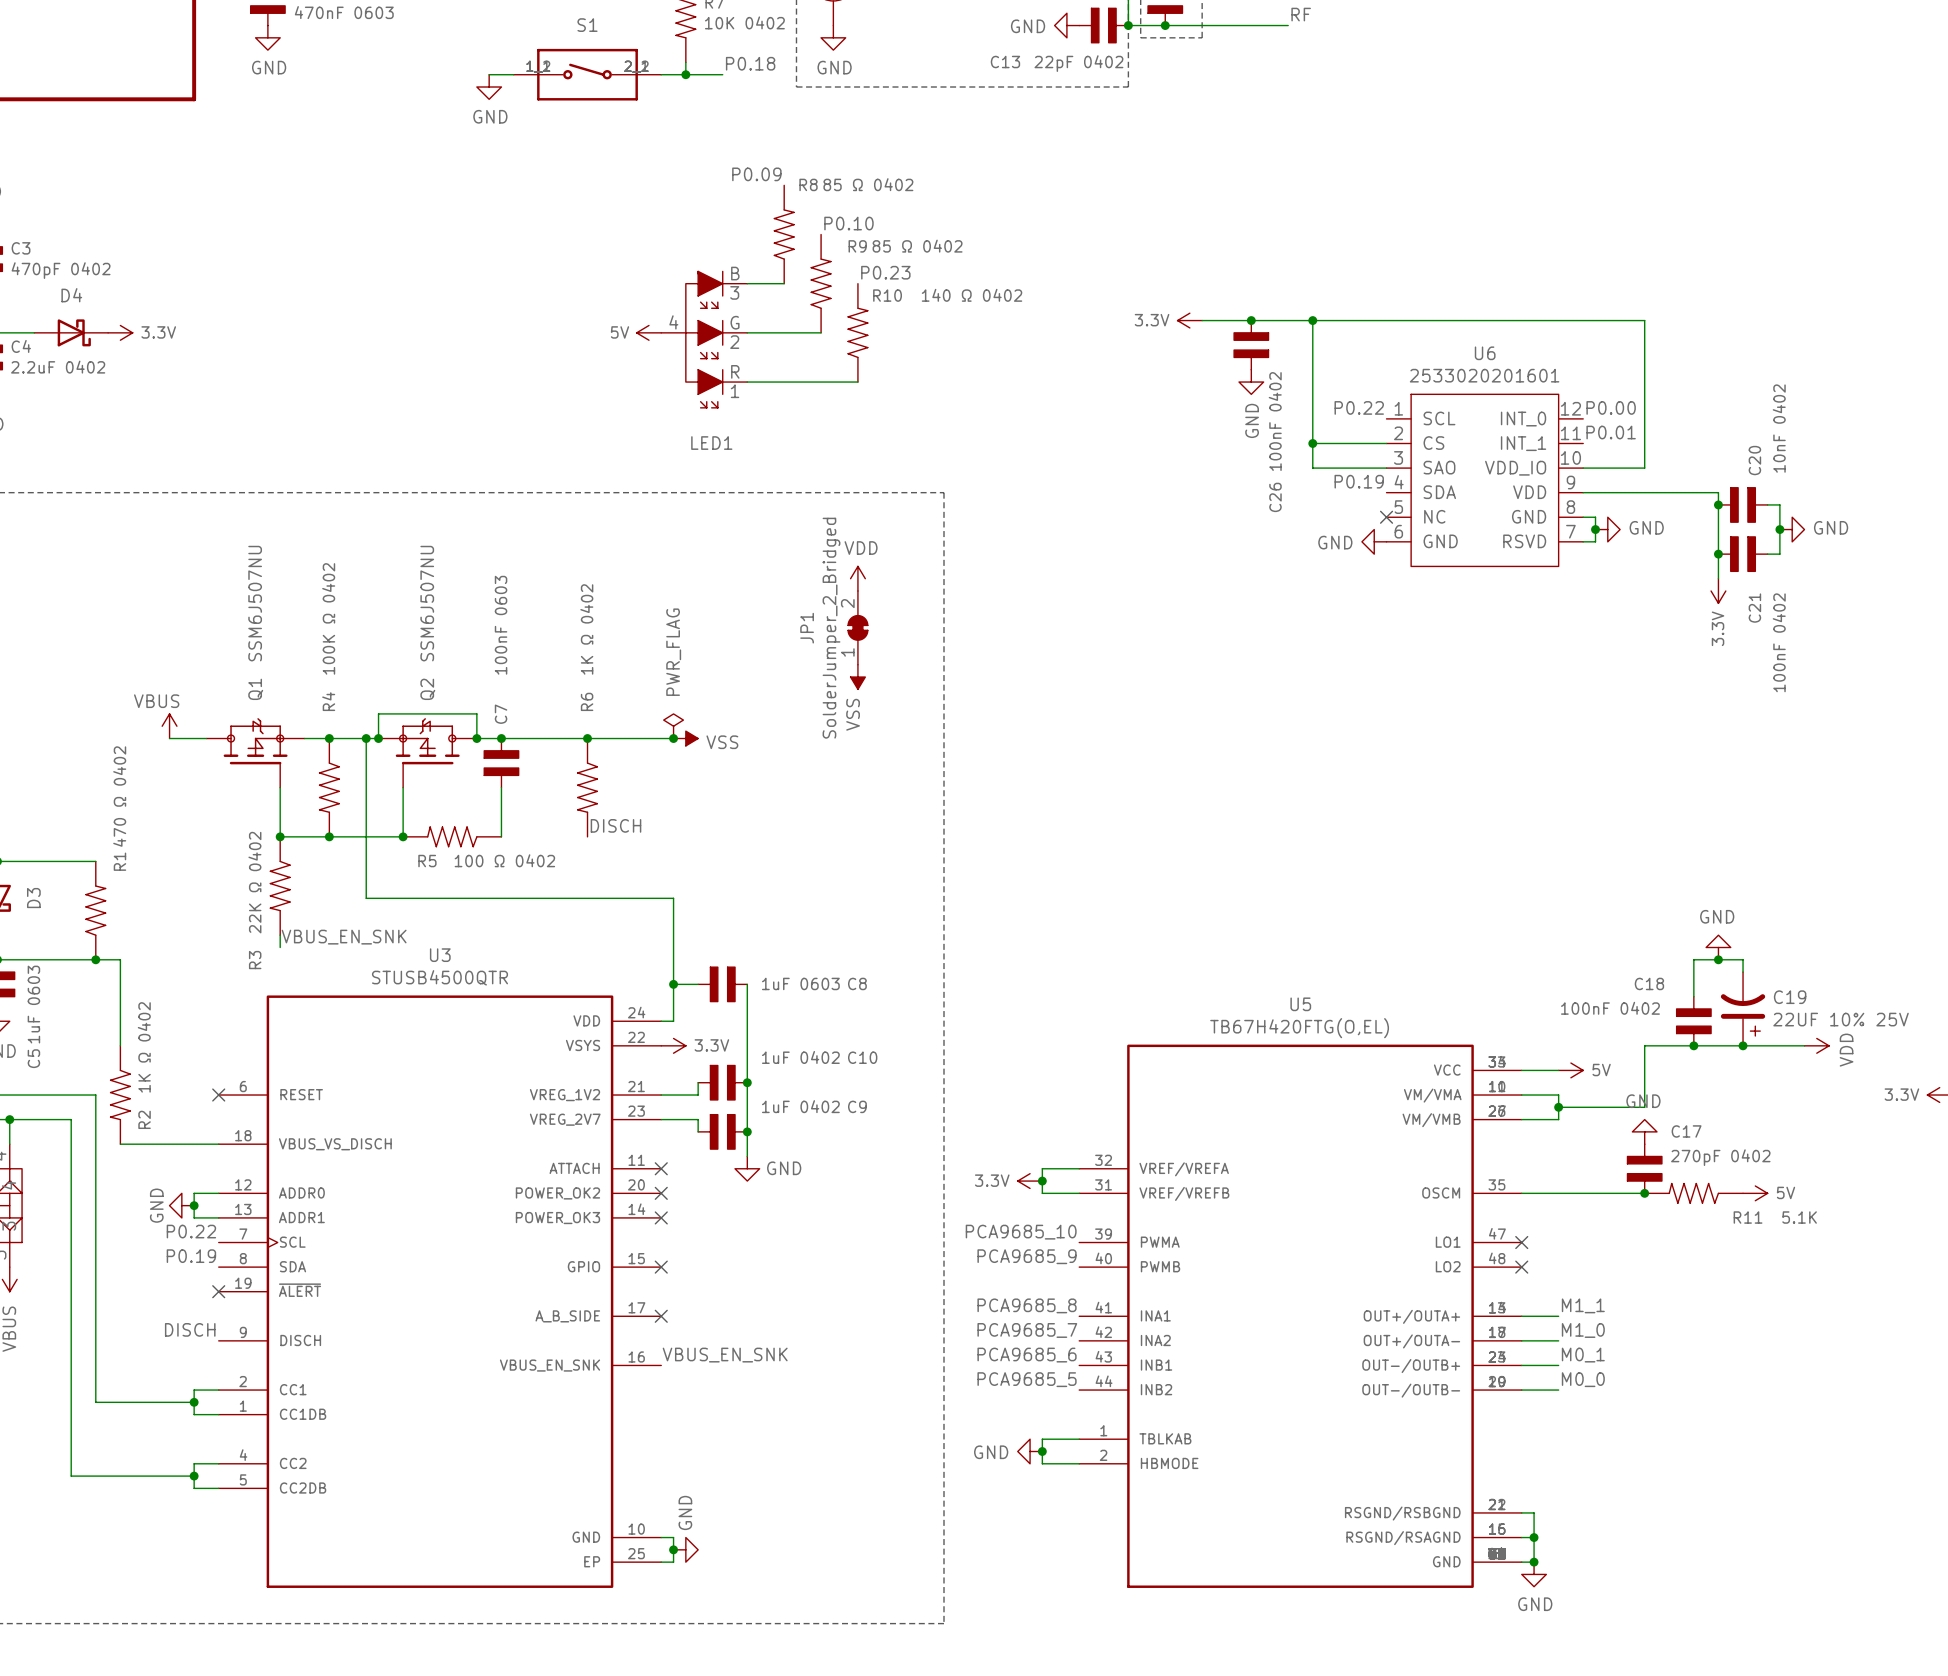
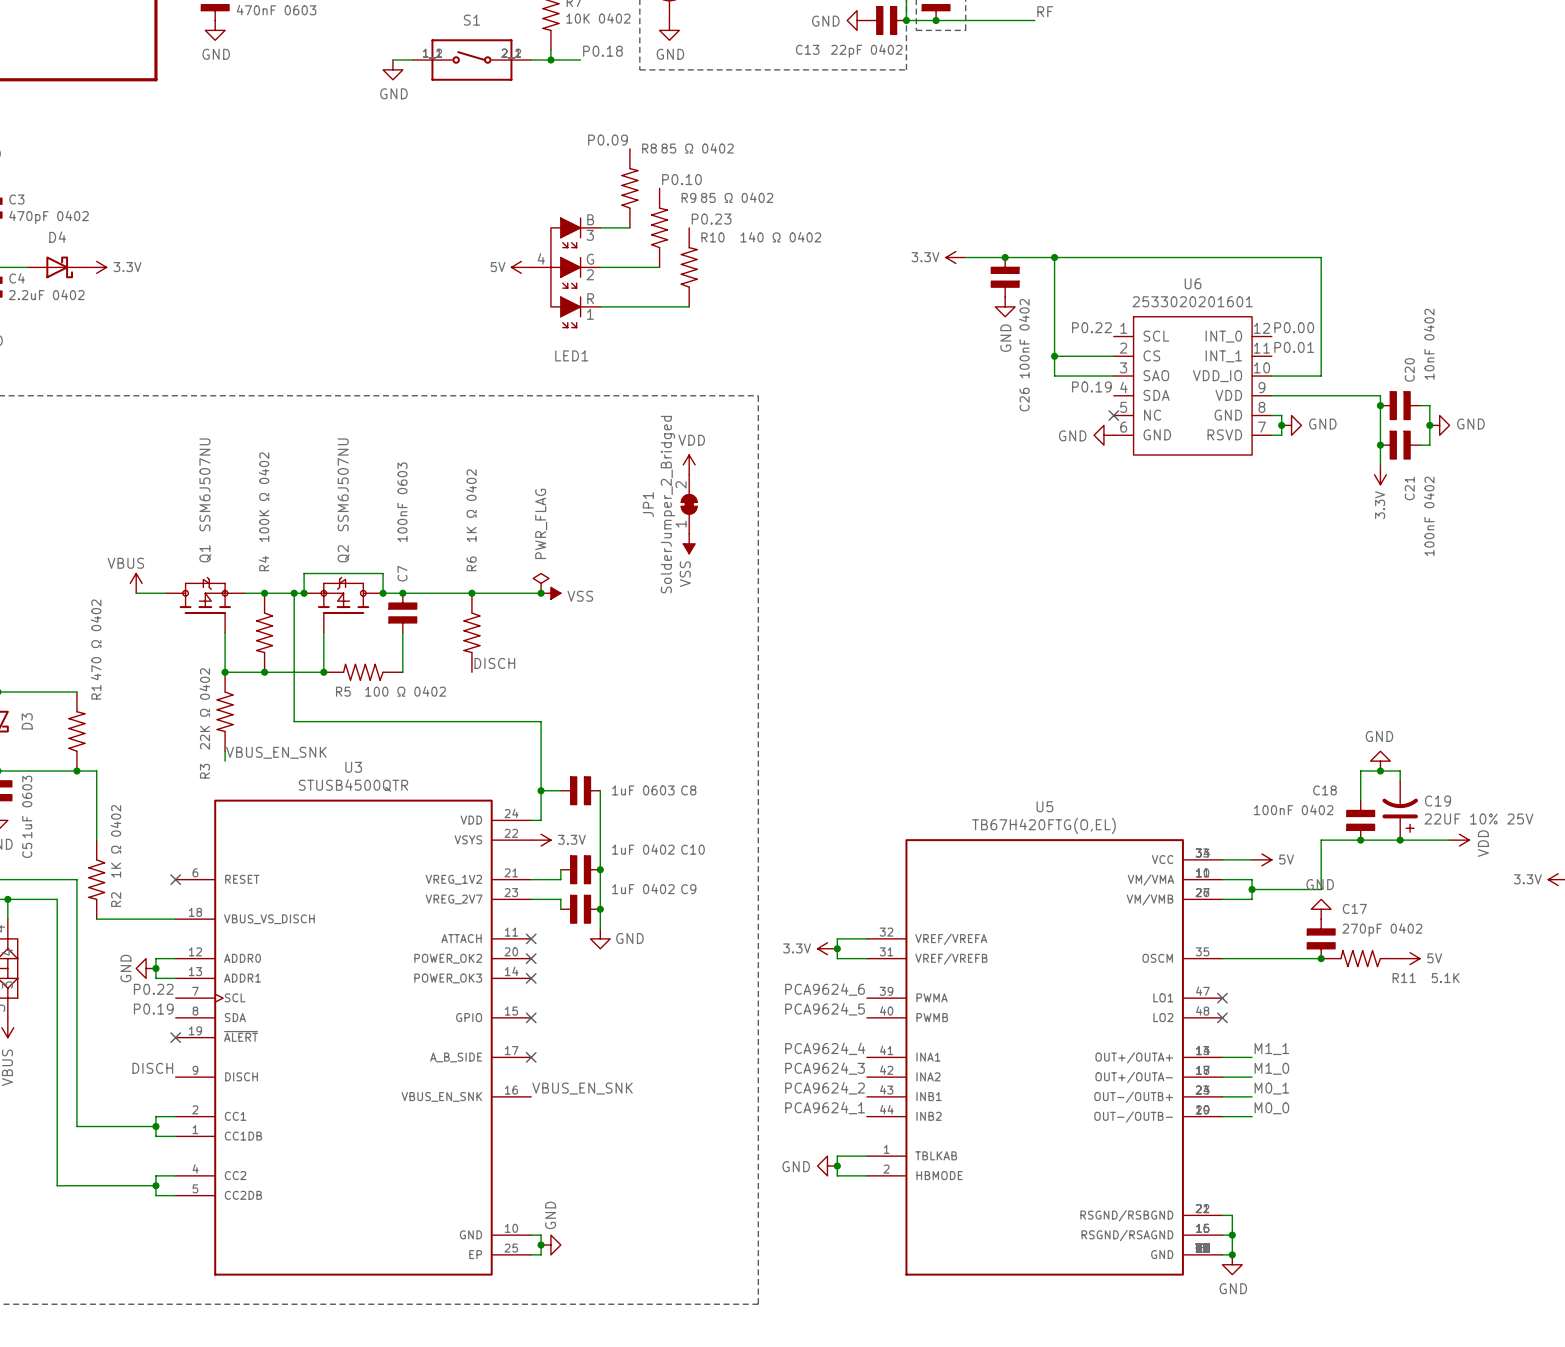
label: PCA9685_10 (1021, 1232) -> PCA9624_6 (825, 989)
label: PCA9685_9 (1027, 1256) -> PCA9624_5 (825, 1009)
label: PCA9685_8 (1027, 1305) -> PCA9624_4 (825, 1048)
label: PCA9685_7 (1027, 1330) -> PCA9624_3 (825, 1068)
label: PCA9685_6 (1027, 1355) -> PCA9624_2 (825, 1088)
label: PCA9685_5 (1027, 1379) -> PCA9624_1 (825, 1108)

